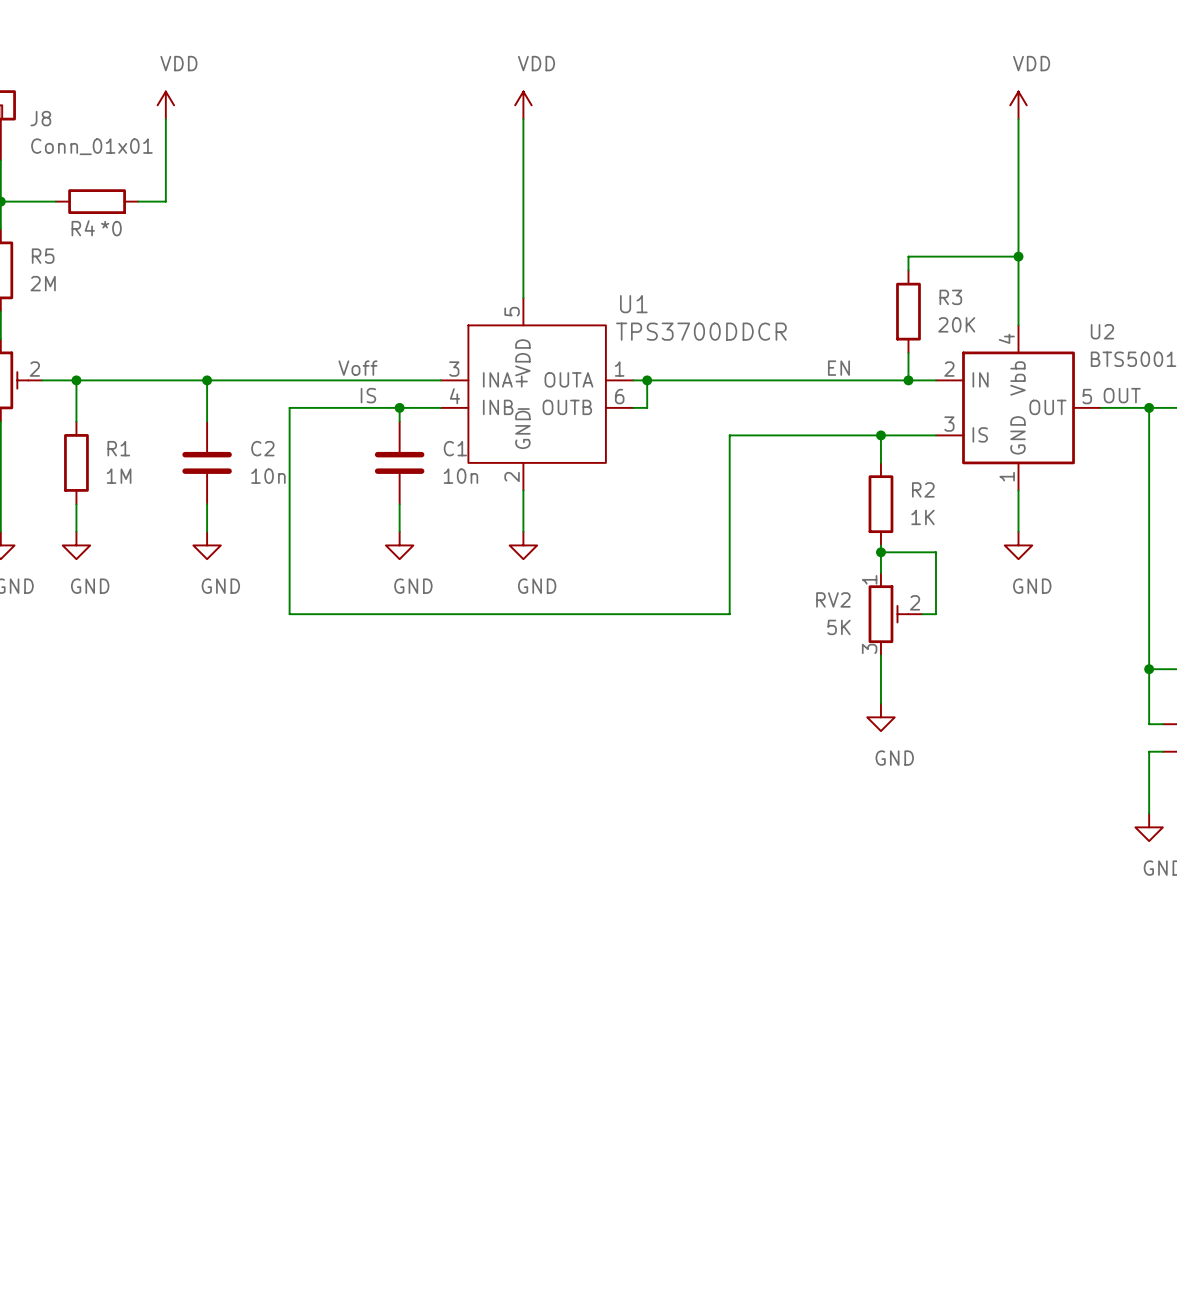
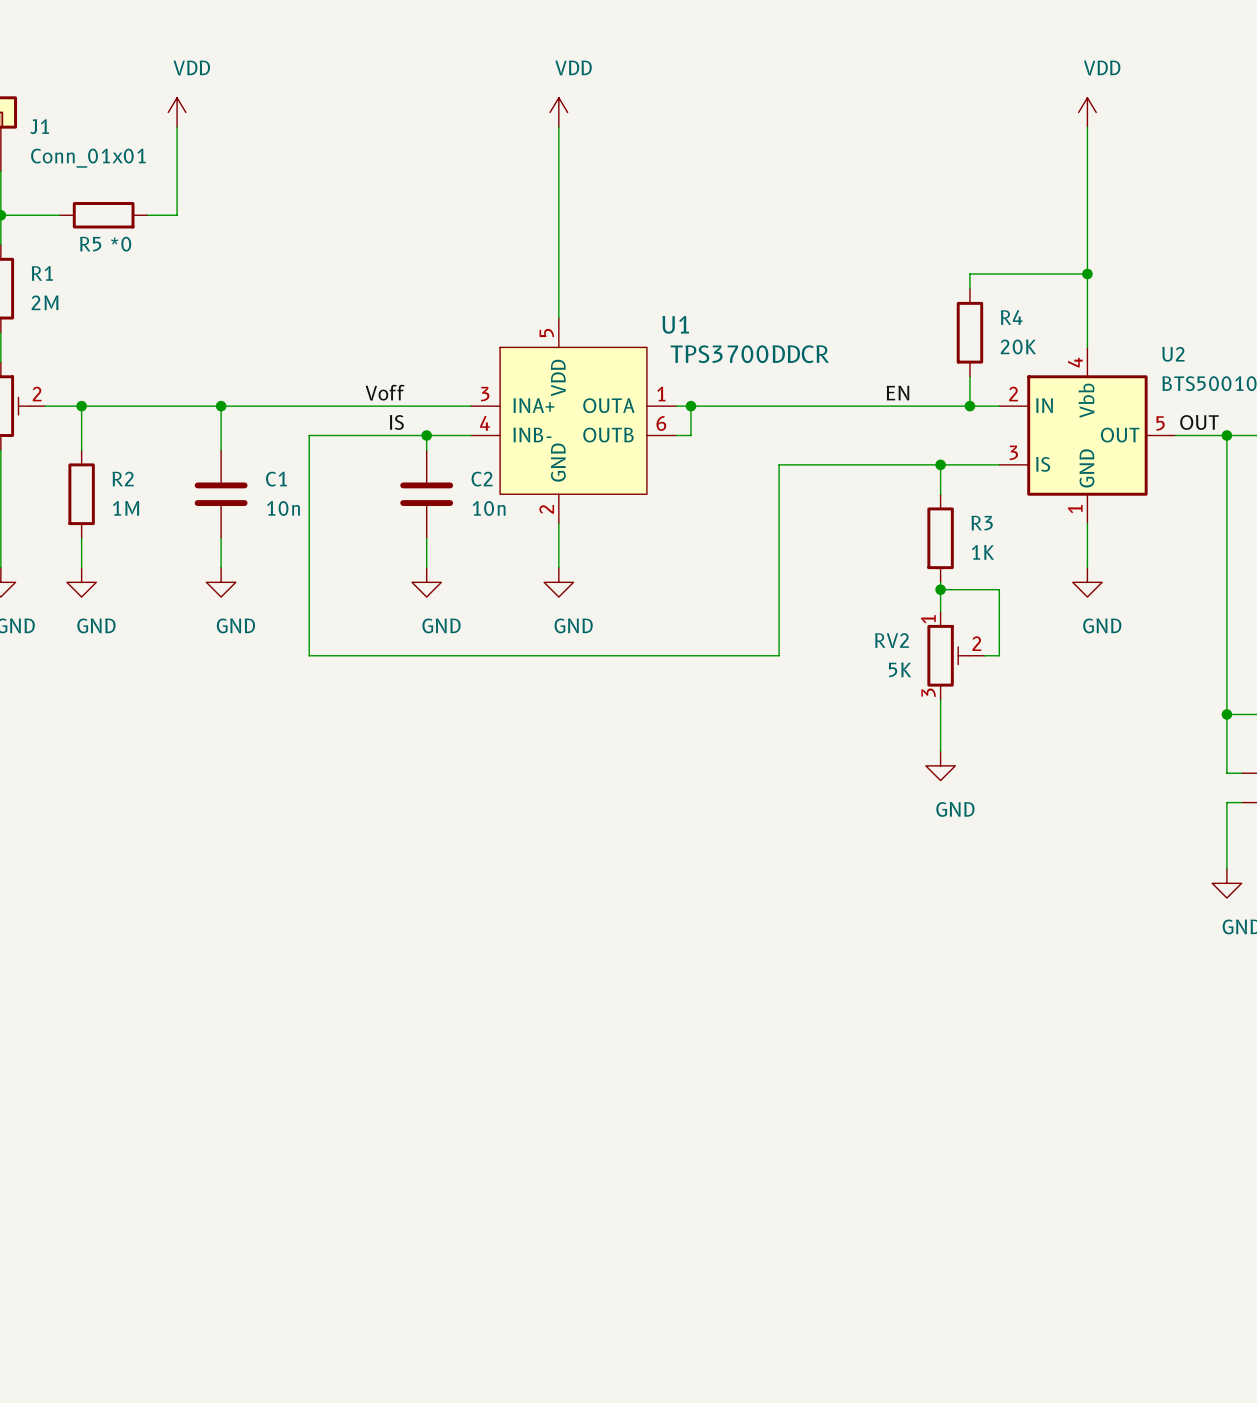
J8 name: J8 (40, 118) -> J1 (39, 126)
R4 name: R4 (83, 228) -> R5 (90, 244)
R5 name: R5 (43, 256) -> R1 (42, 273)
R3 name: R3 (950, 297) -> R4 (1011, 317)
R1 name: R1 (118, 448) -> R2 (123, 479)
C2 name: C2 (262, 448) -> C1 (276, 479)
C1 name: C1 (455, 448) -> C2 (482, 479)
R2 name: R2 (923, 489) -> R3 (982, 523)

